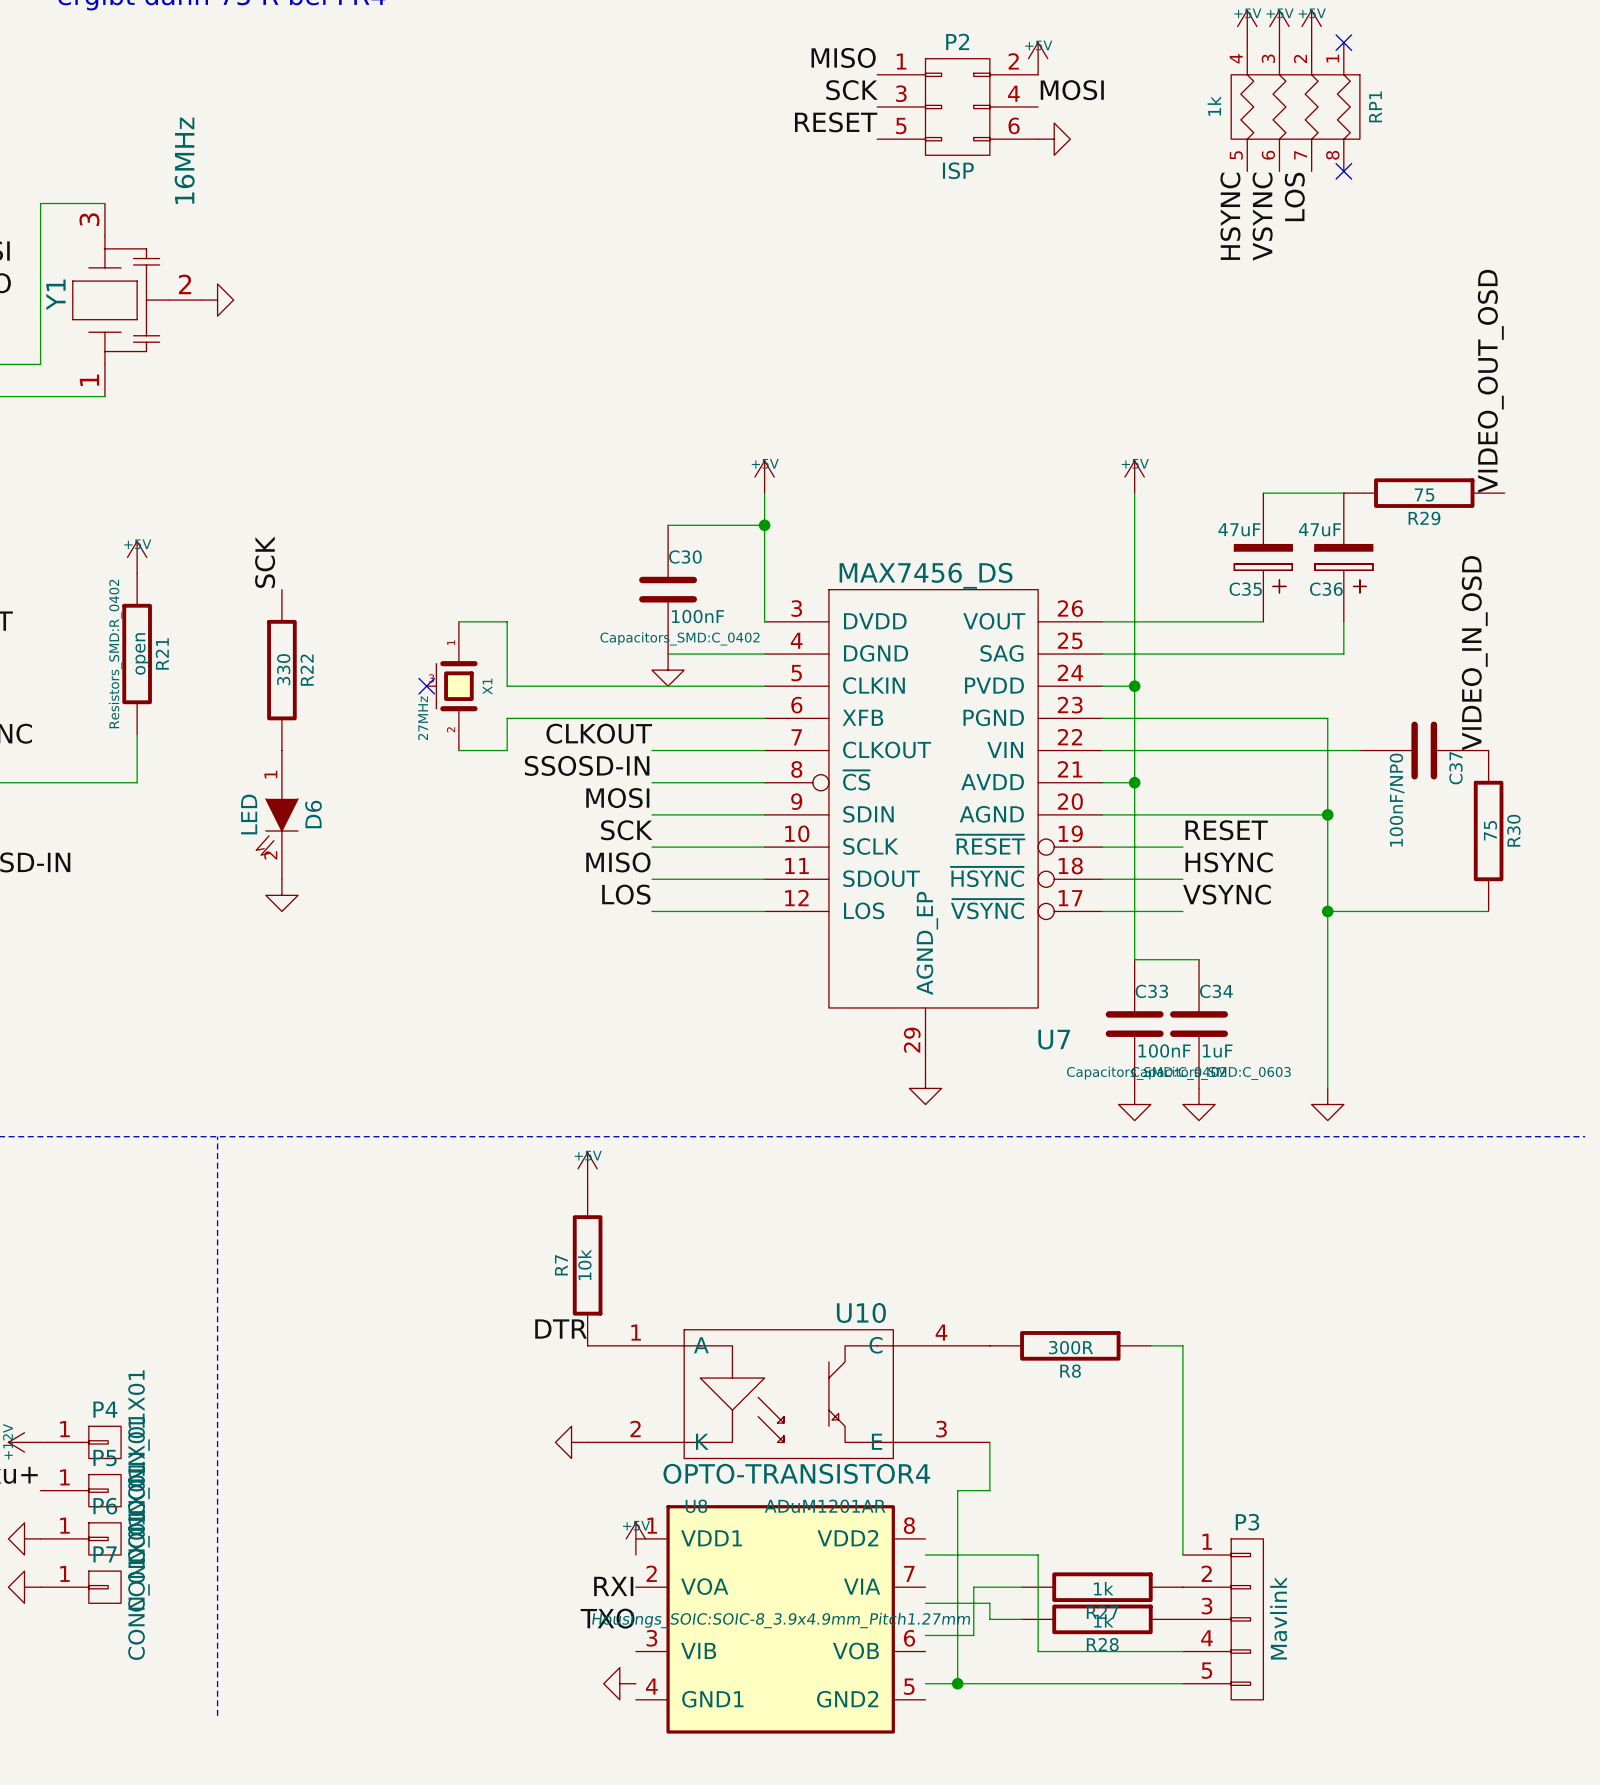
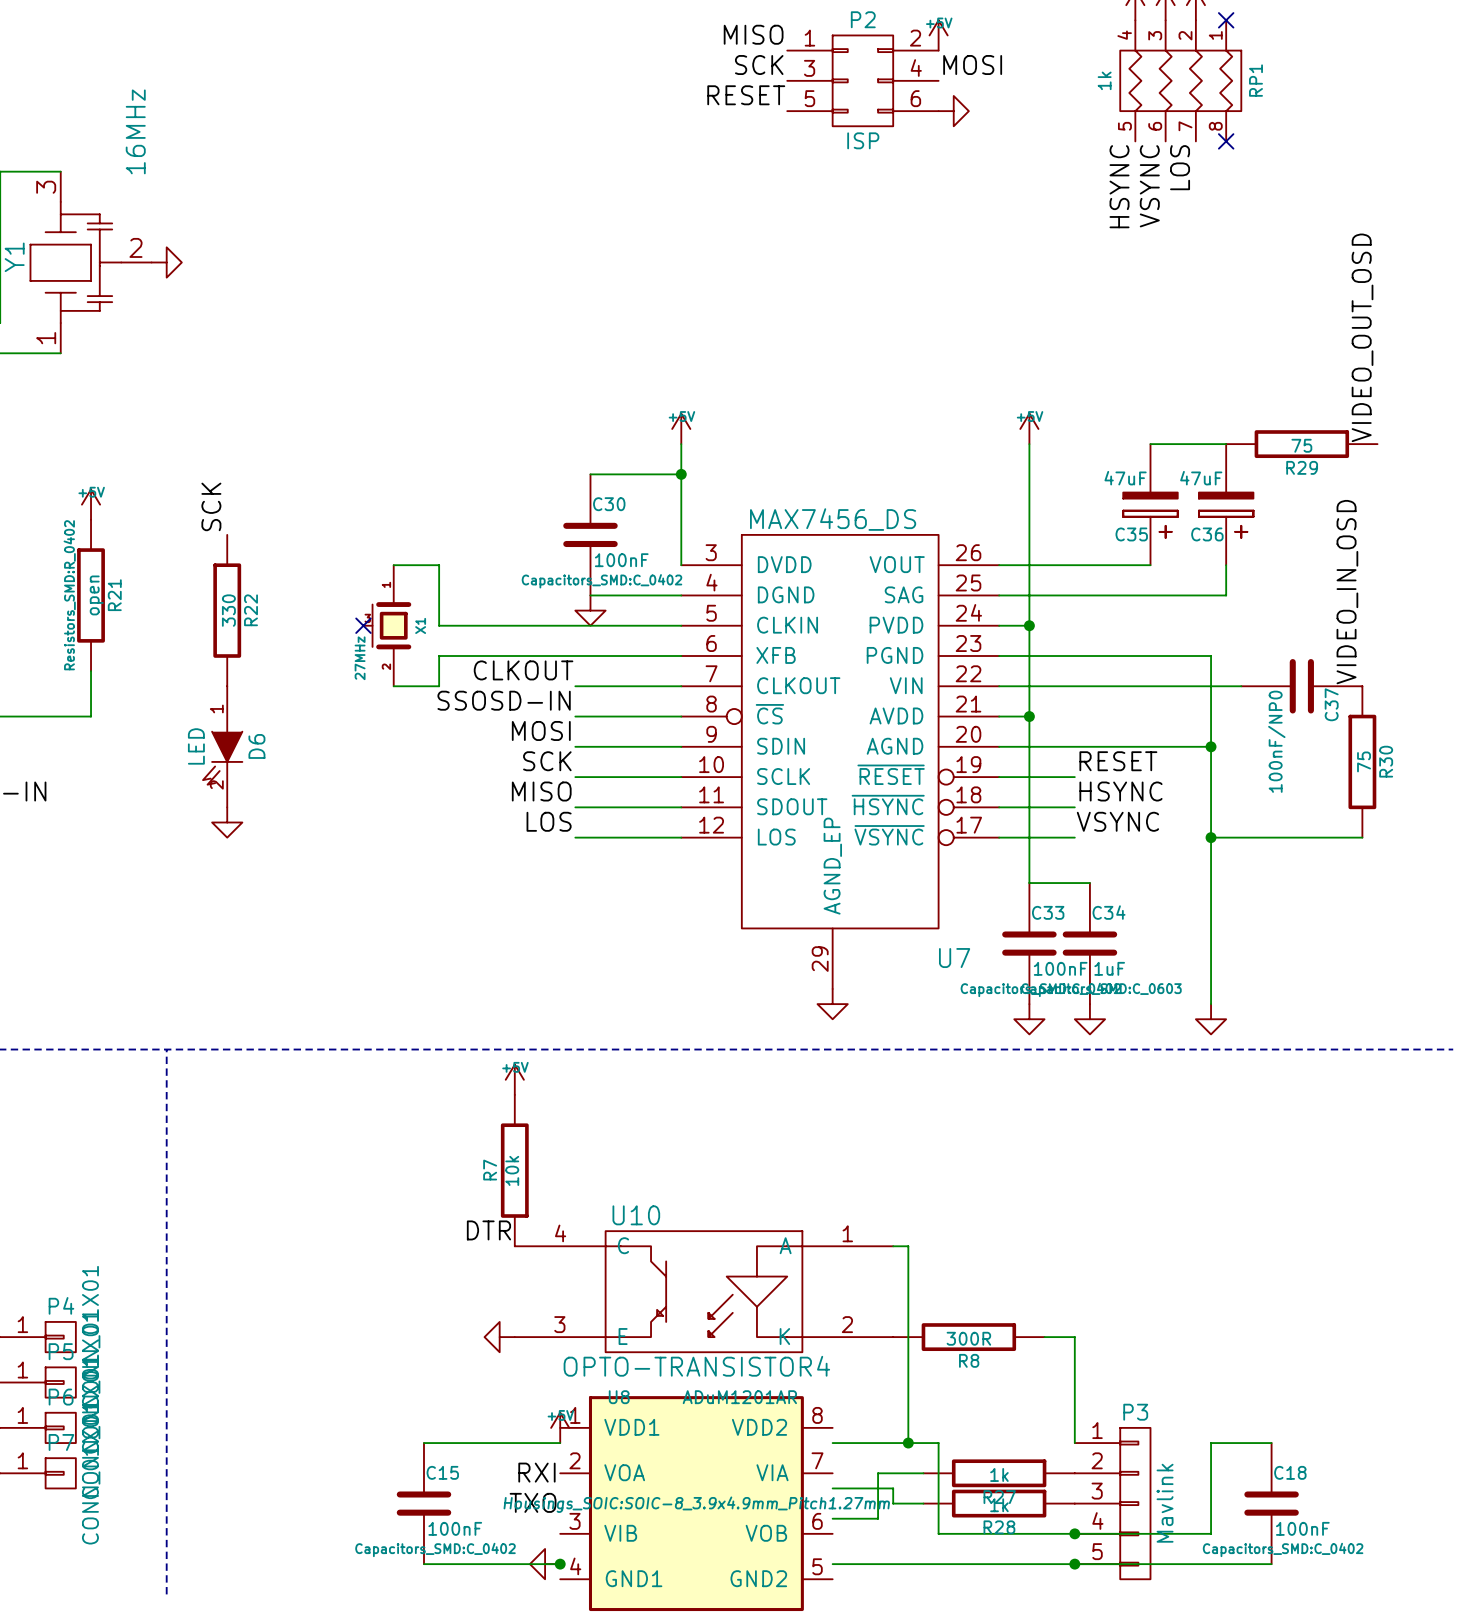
wire: none -> (893, 1246) (908, 1246) (908, 1443)
R8 position: (1070, 1345) -> (968, 1337)
wire: (1150, 1345) (1182, 1345) (1182, 1442) -> (1044, 1337) (1074, 1337)
U10 flip: as is (788, 1394) -> left-right (704, 1291)
wire: (989, 1442) (989, 1490) (957, 1490) (957, 1683) -> none
wire: none -> (423, 1443) (560, 1443)
junction: none -> (908, 1443)
wire: none -> (1271, 1443) (1211, 1443) (1211, 1533) (1074, 1533)
C15: none -> 100nF (423, 1503)
C18: none -> 100nF (1271, 1503)
junction: none -> (1074, 1533)
wire: none -> (423, 1564) (560, 1564)
junction: none -> (560, 1564)
junction: (957, 1683) -> none
wire: none -> (1074, 1564) (1271, 1564)
junction: none -> (1074, 1564)

